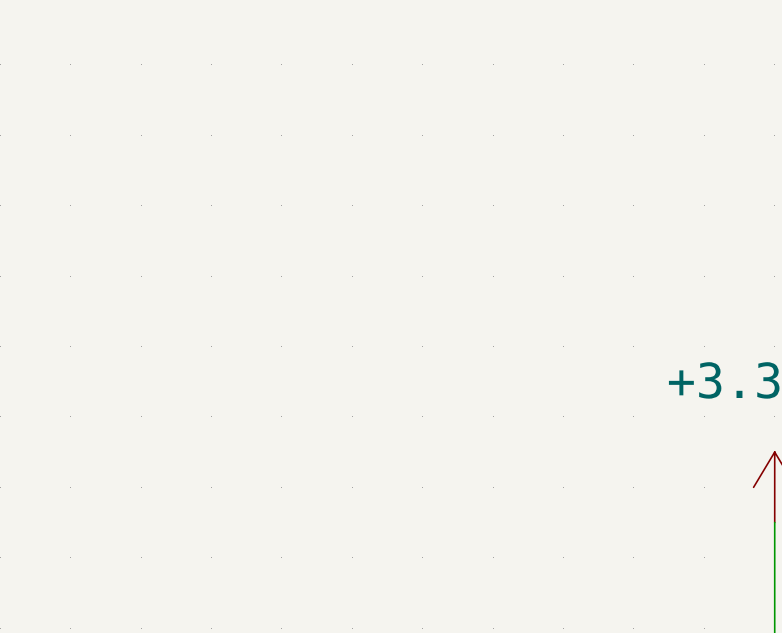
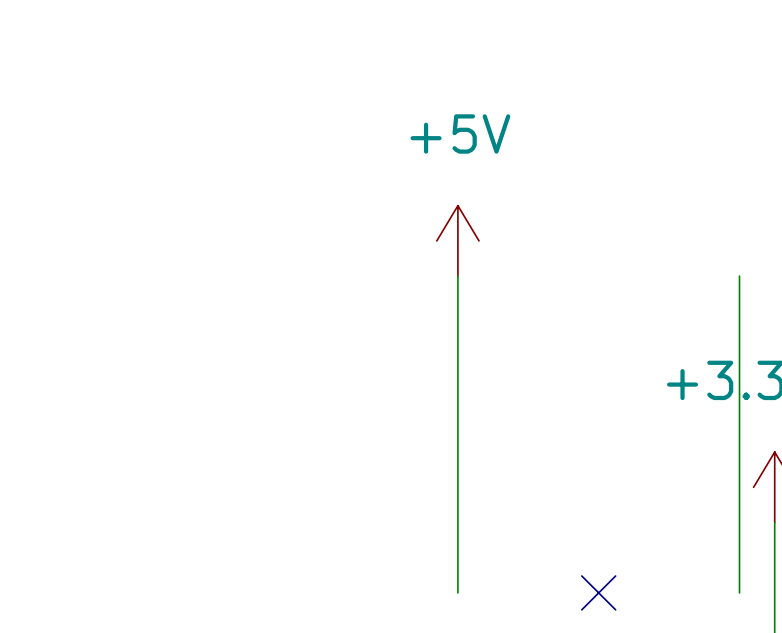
power symbol: none -> +5V (457, 240)
wire: none -> (457, 276) (457, 592)
wire: none -> (739, 276) (739, 592)
no-connect mark: none -> (598, 592)

